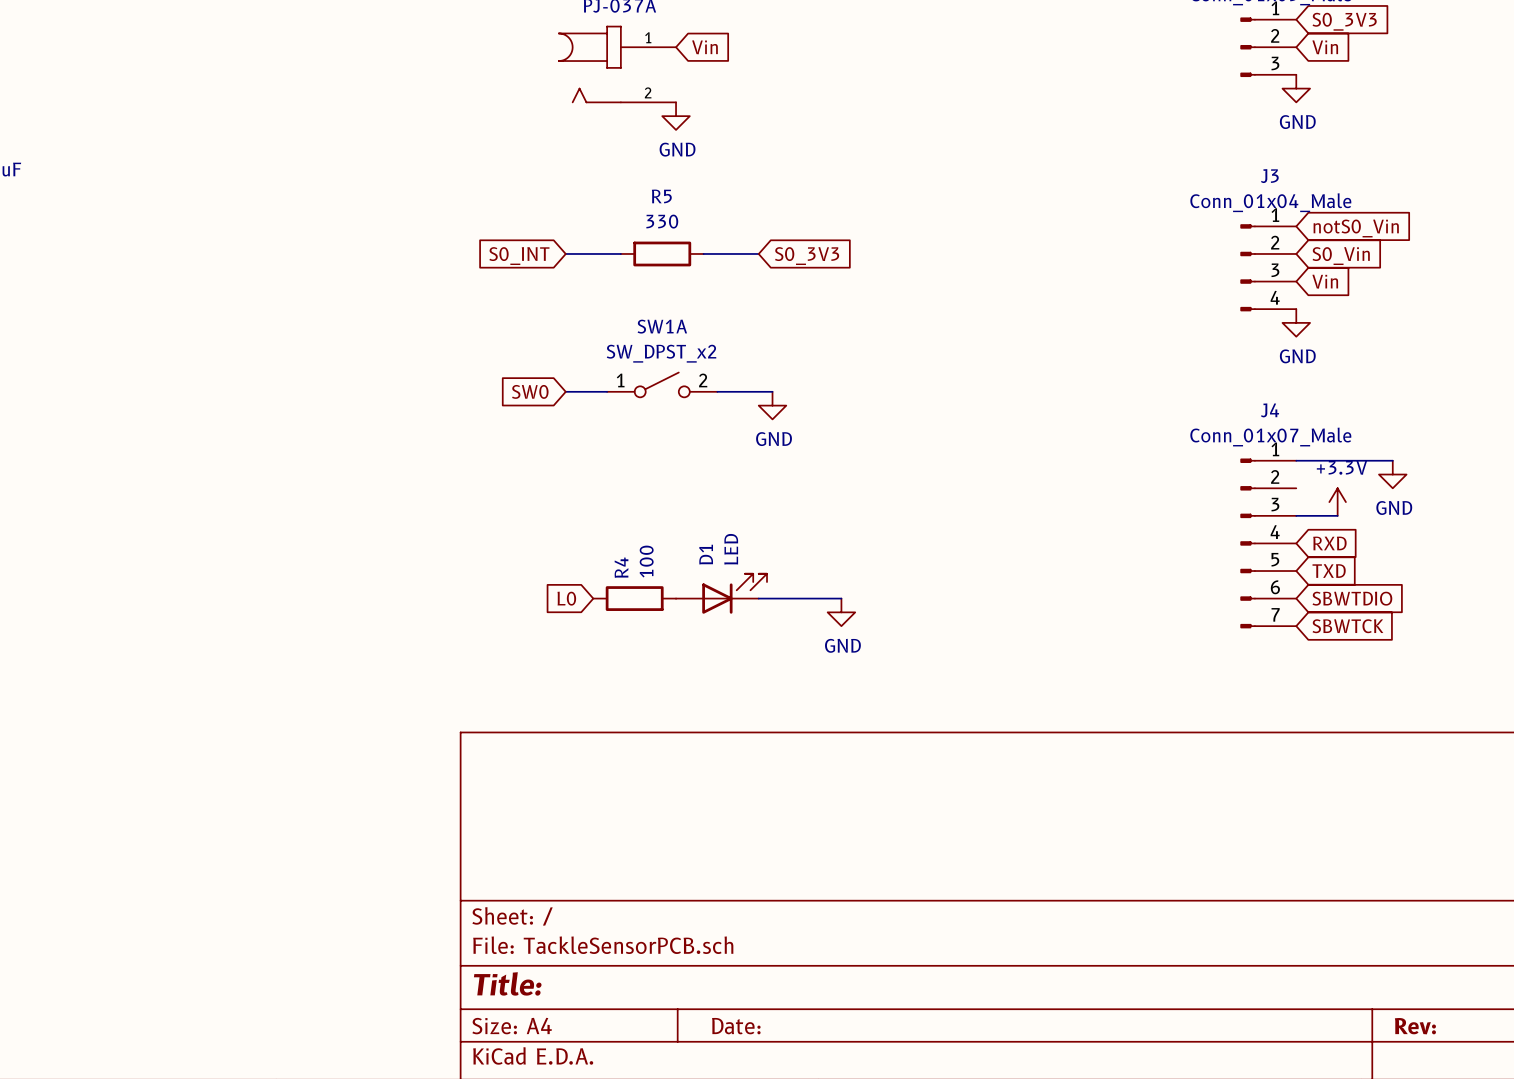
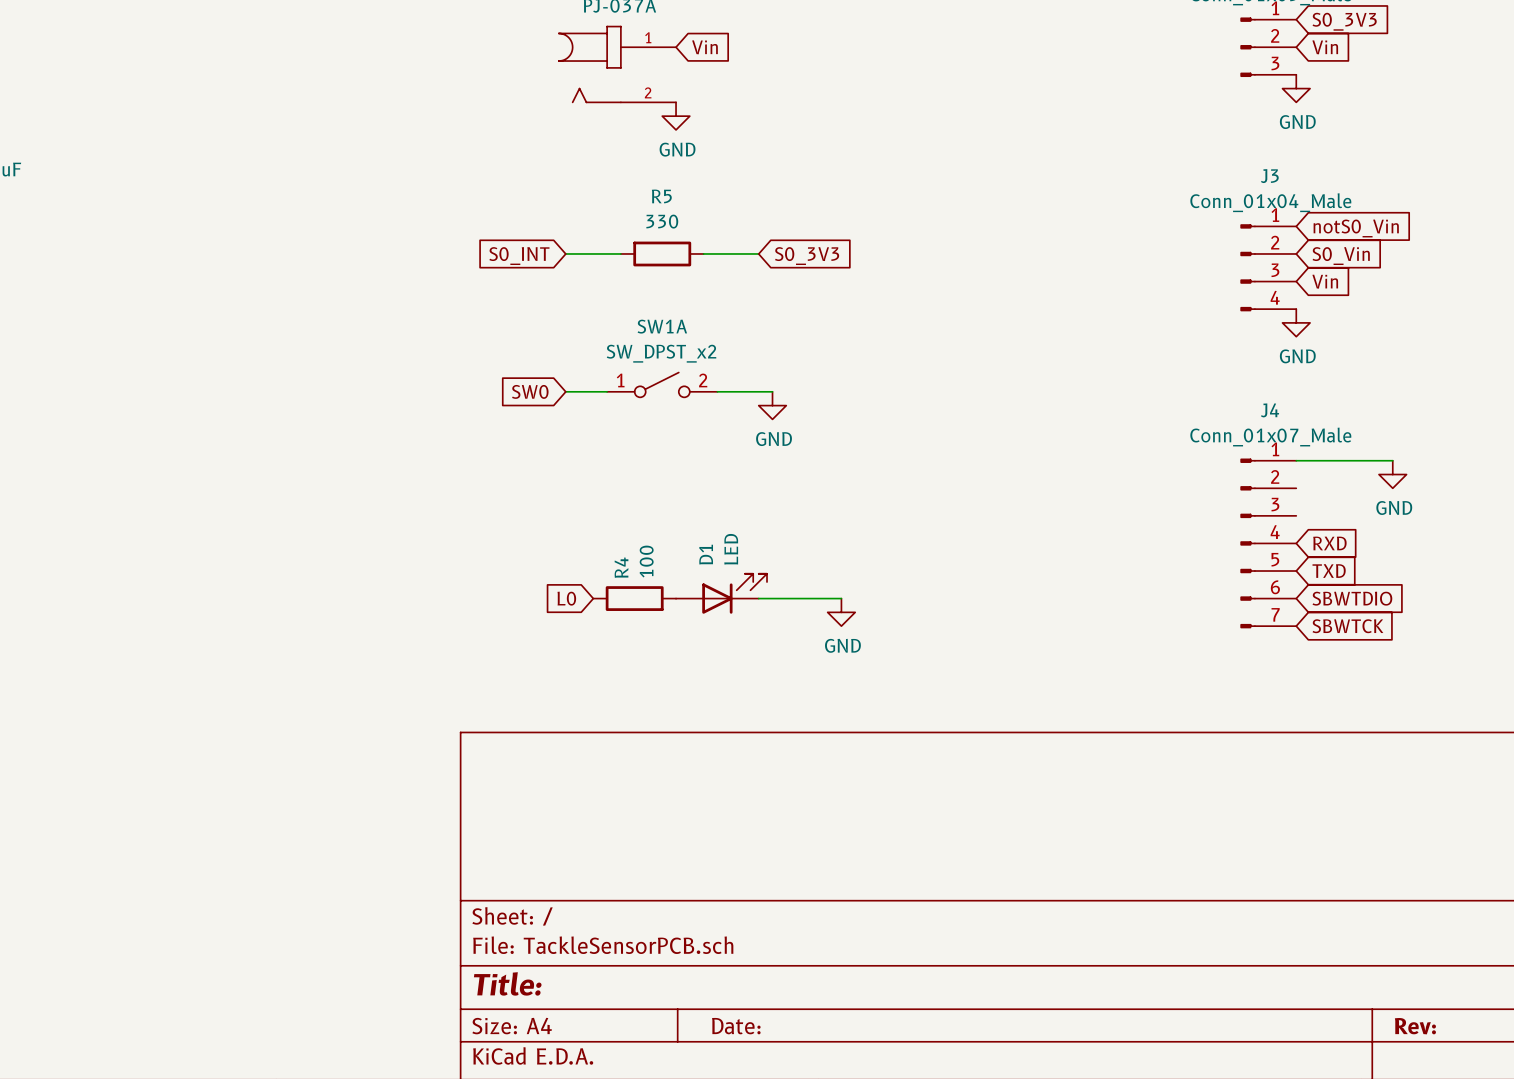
power symbol: +3.3V (1337, 502) -> none
wire: (1296, 515) (1337, 515) -> none

